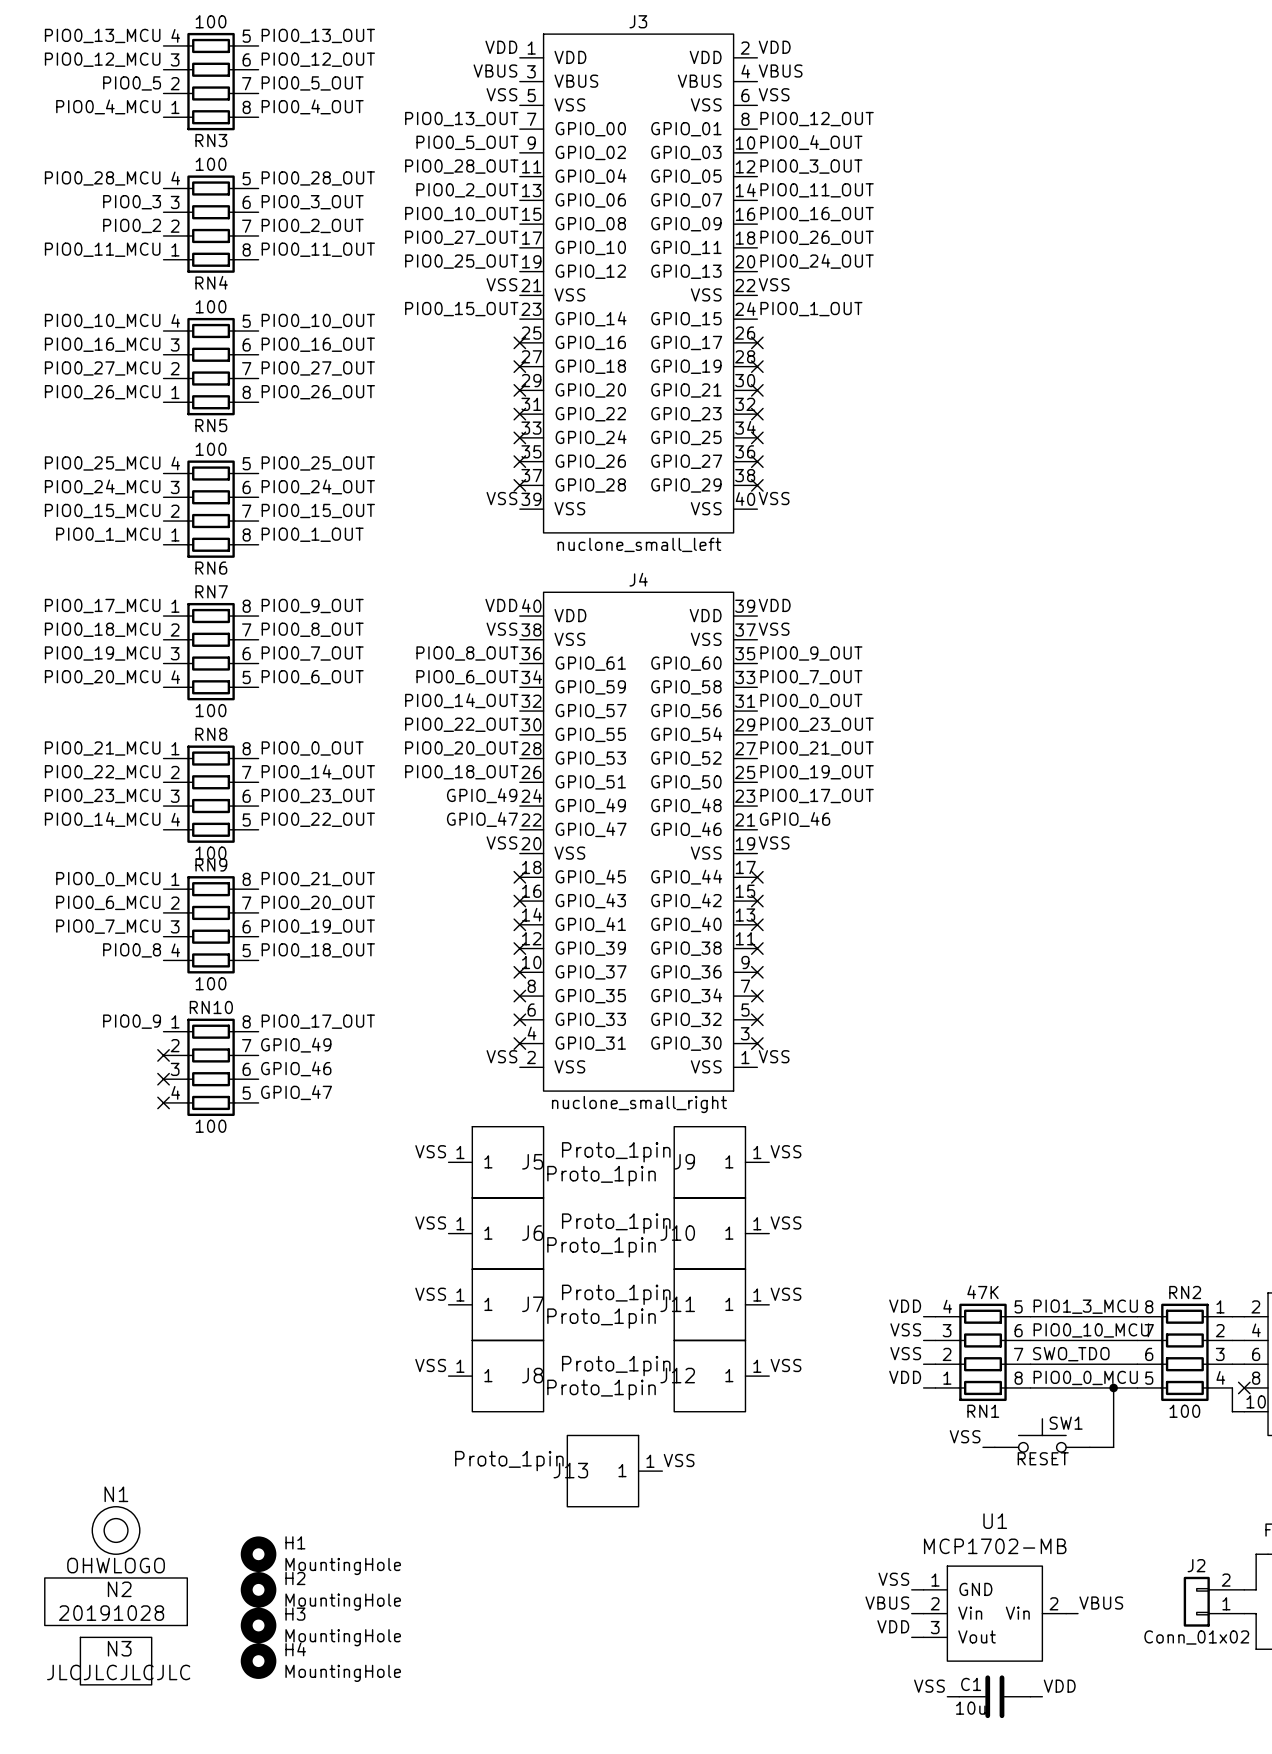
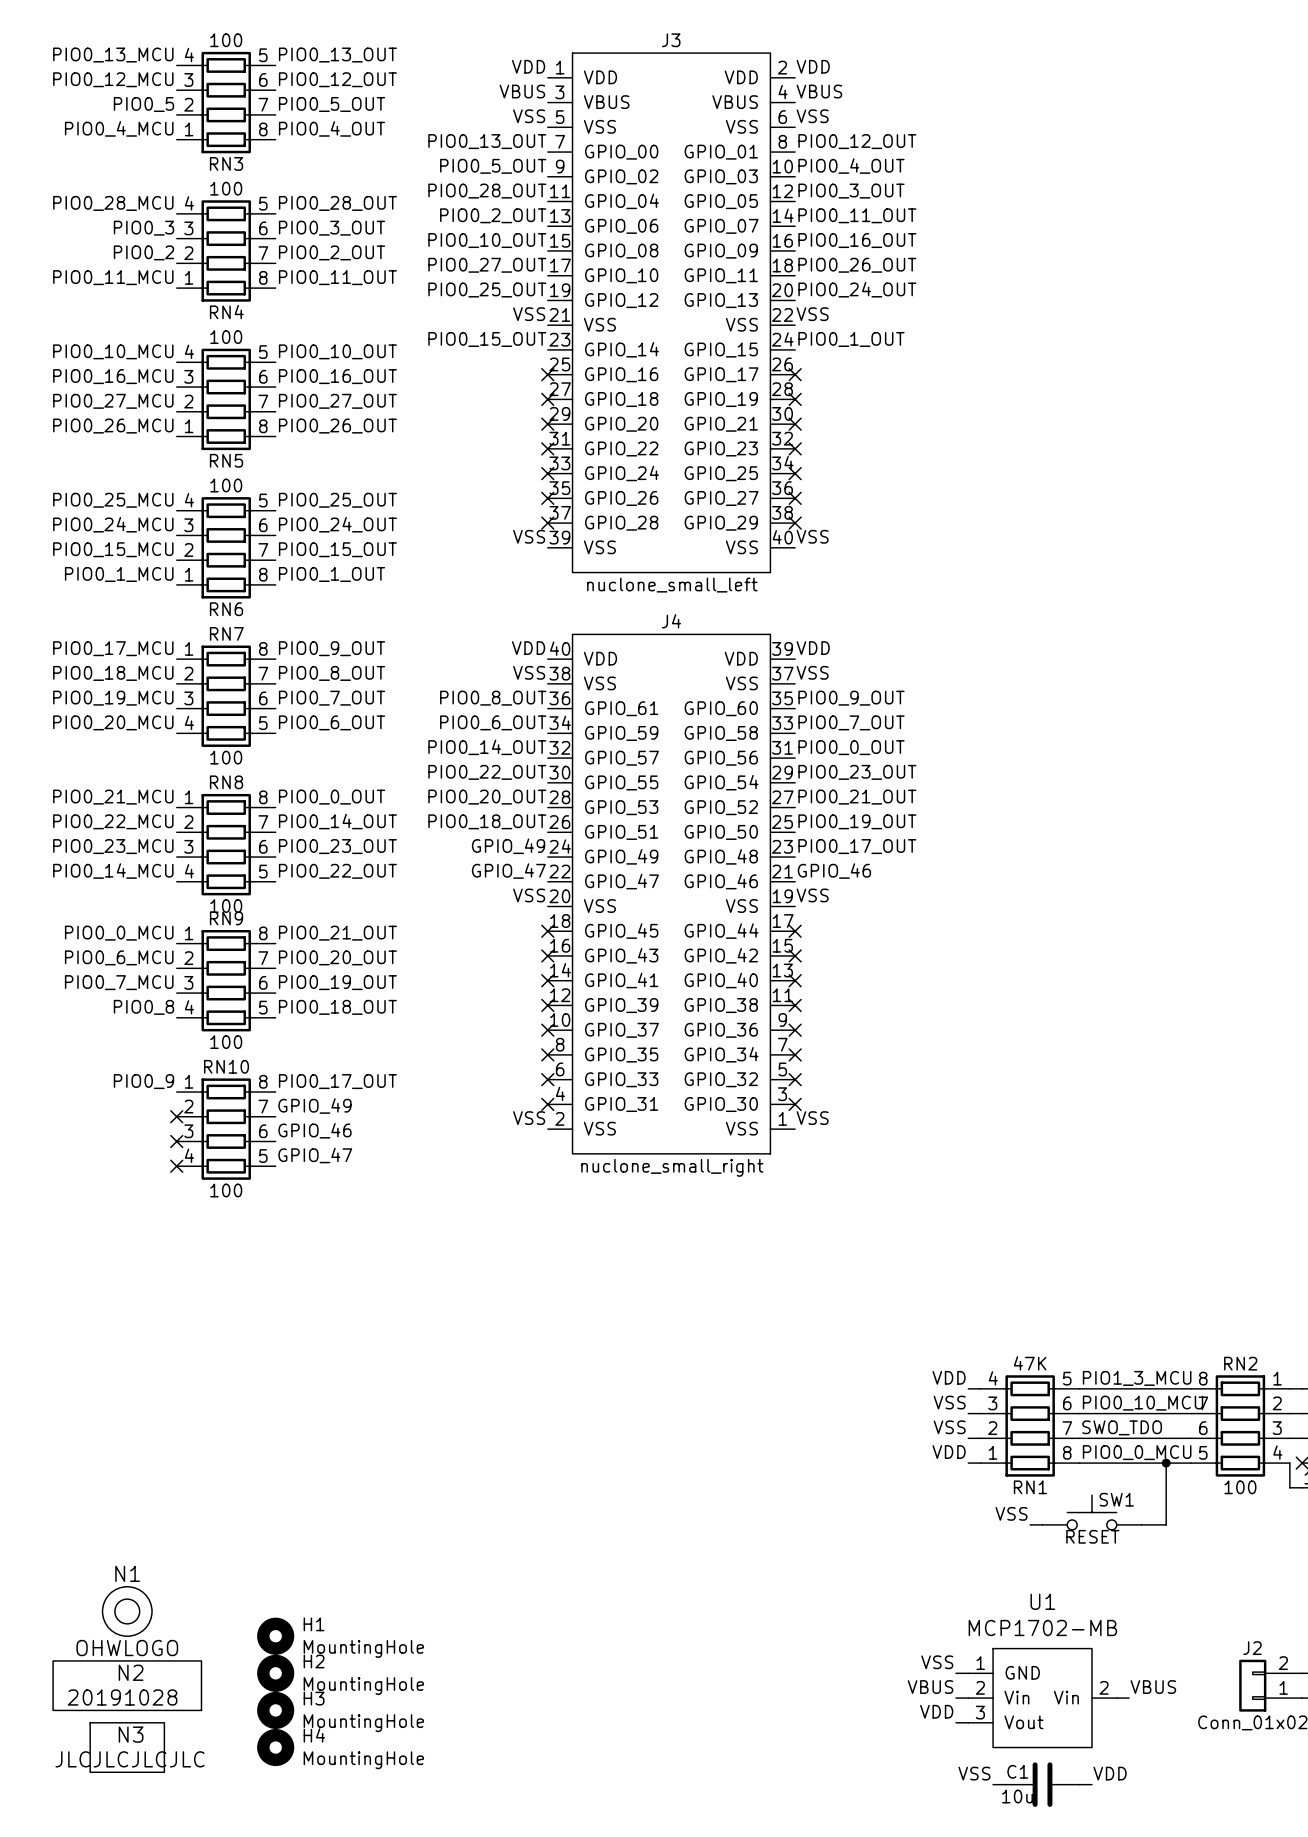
label: VSS (430, 1151) -> none
label: VSS (785, 1151) -> none
J5: Proto_1pin (496, 1162) -> none
J9: Proto_1pin (721, 1162) -> none
label: VSS (430, 1222) -> none
label: VSS (785, 1222) -> none
J6: Proto_1pin (496, 1233) -> none
J10: Proto_1pin (721, 1233) -> none
label: VSS (430, 1294) -> none
label: VSS (785, 1294) -> none
J7: Proto_1pin (496, 1304) -> none
J11: Proto_1pin (721, 1304) -> none
label: VSS (430, 1365) -> none
label: VSS (785, 1365) -> none
J8: Proto_1pin (496, 1376) -> none
J12: Proto_1pin (721, 1376) -> none
label: VSS (679, 1460) -> none
J13: Proto_1pin (614, 1471) -> none

